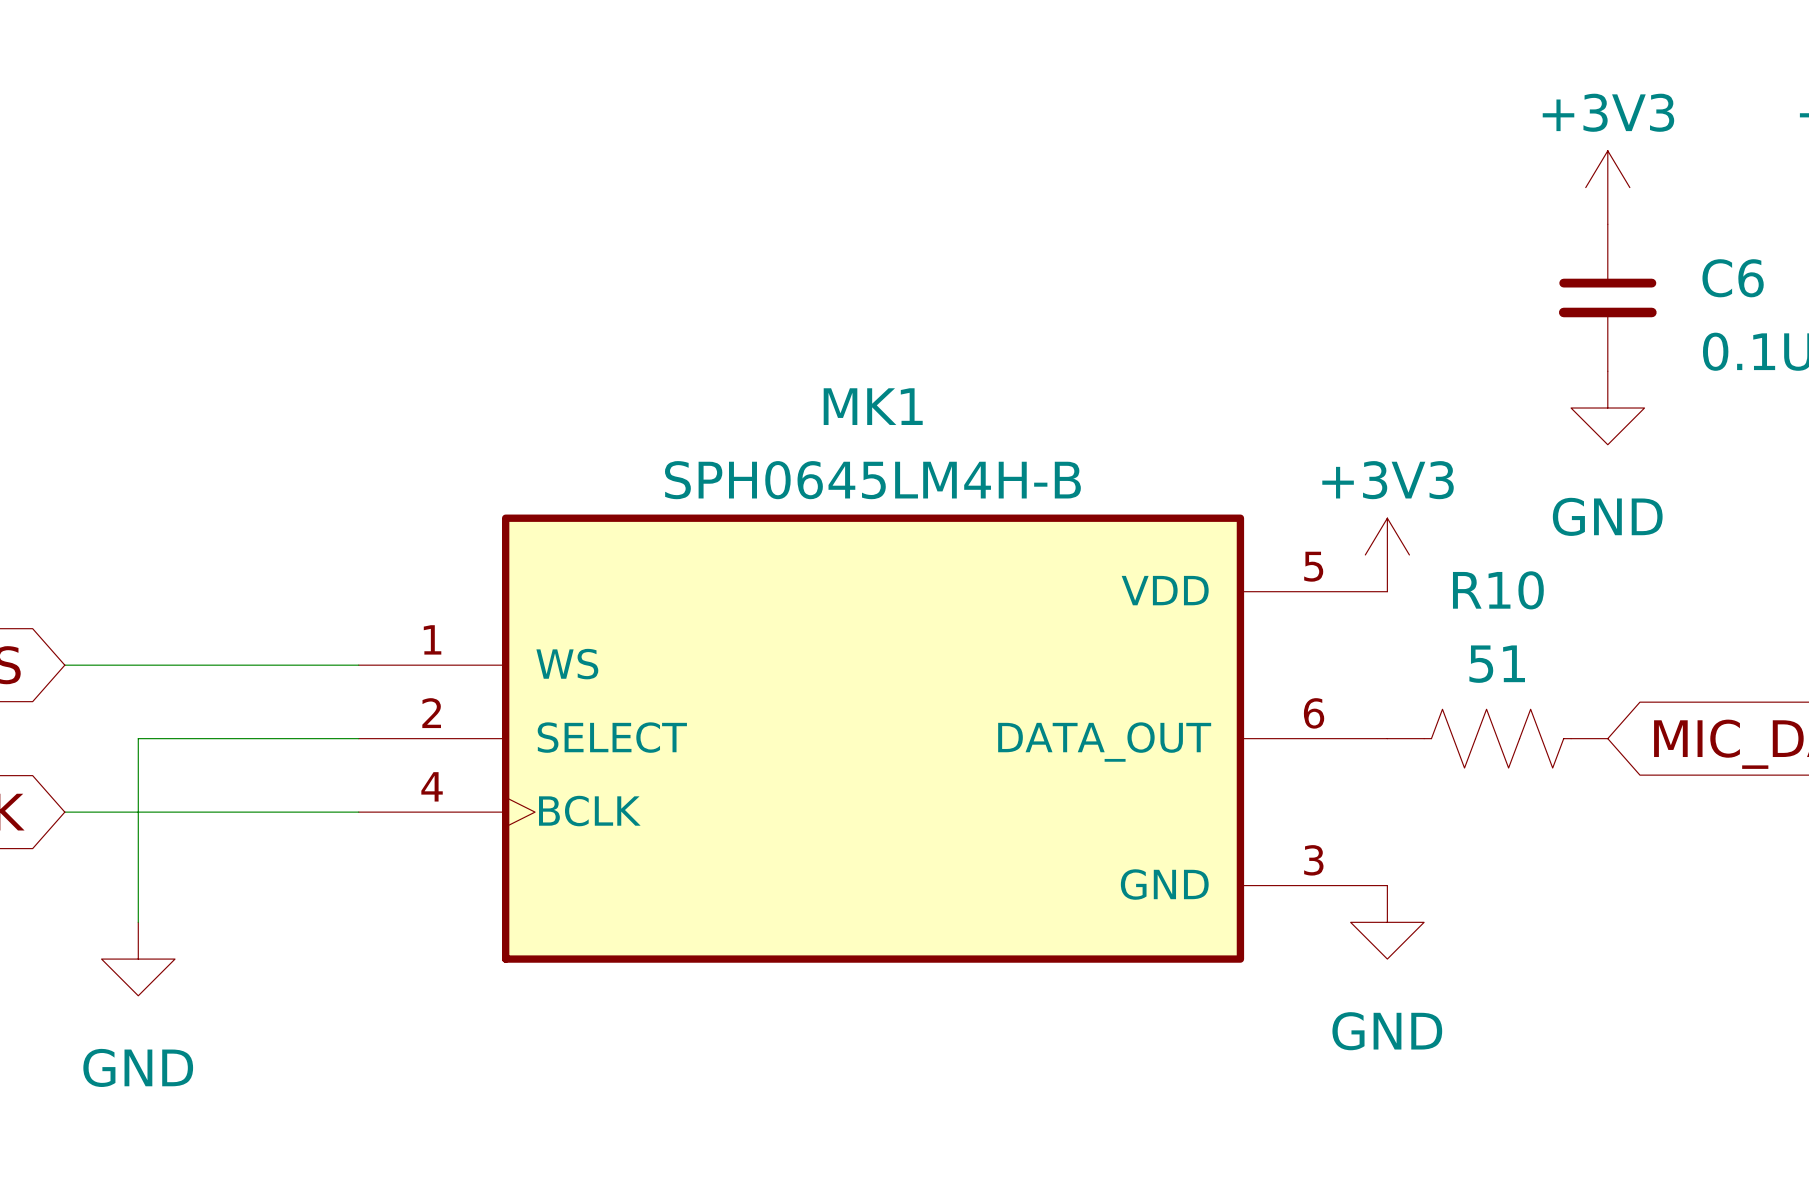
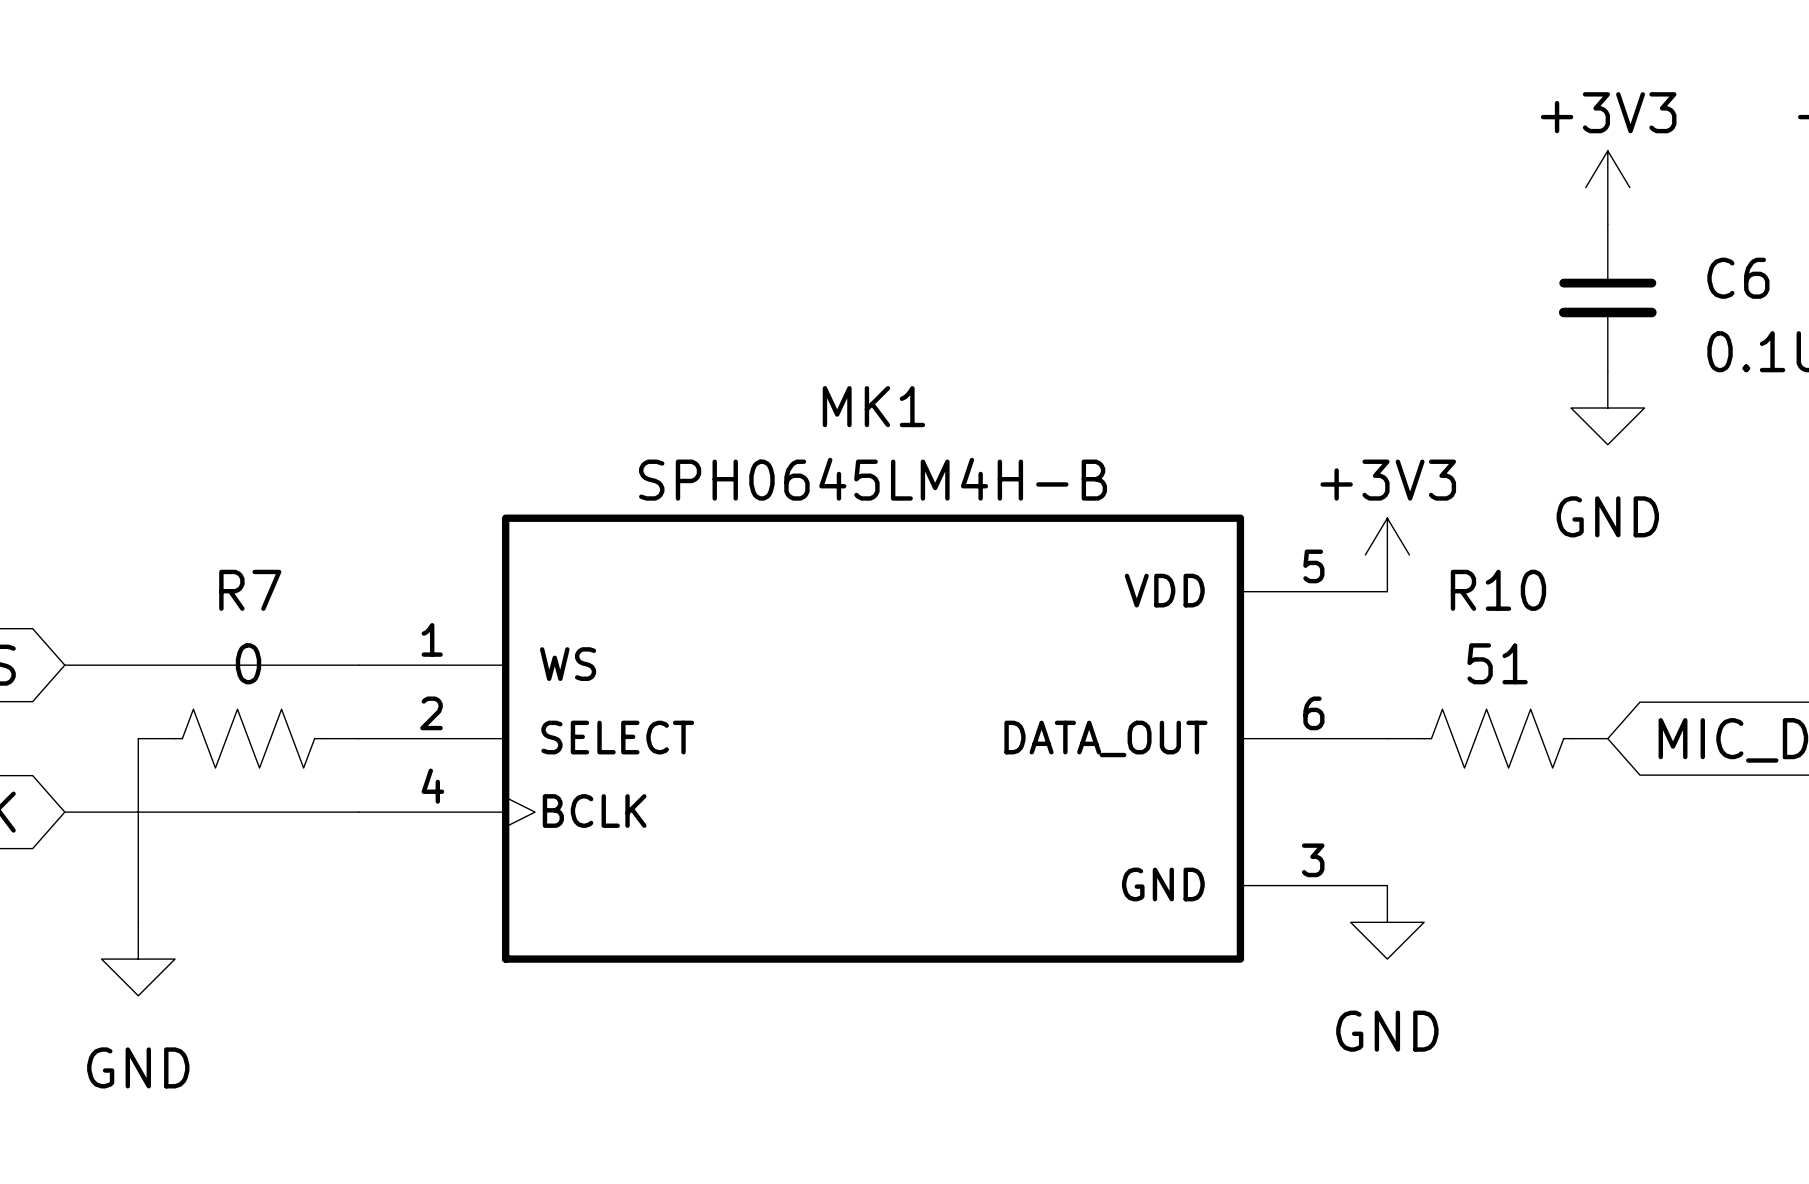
wire: (138, 738) (358, 738) -> none
R7: none -> 0 (248, 738)

